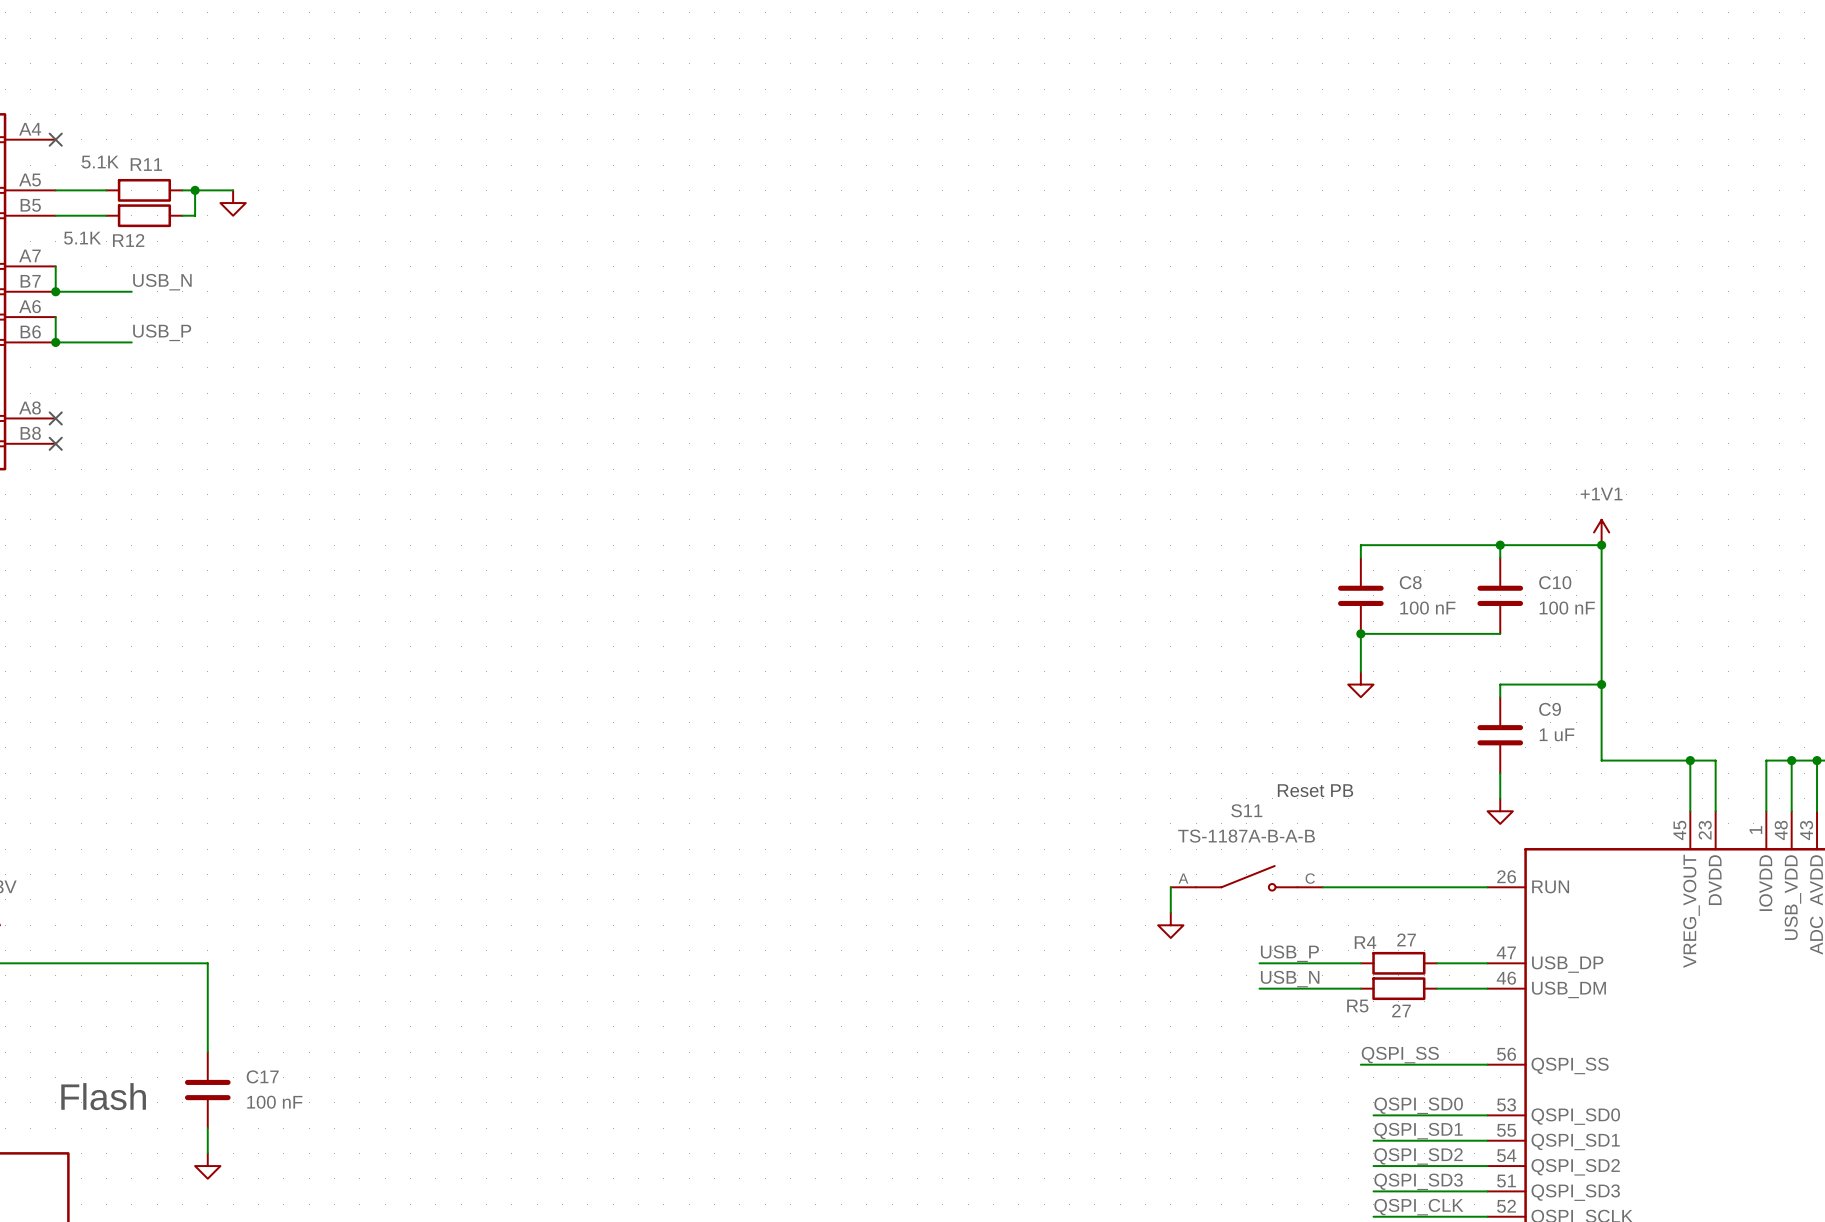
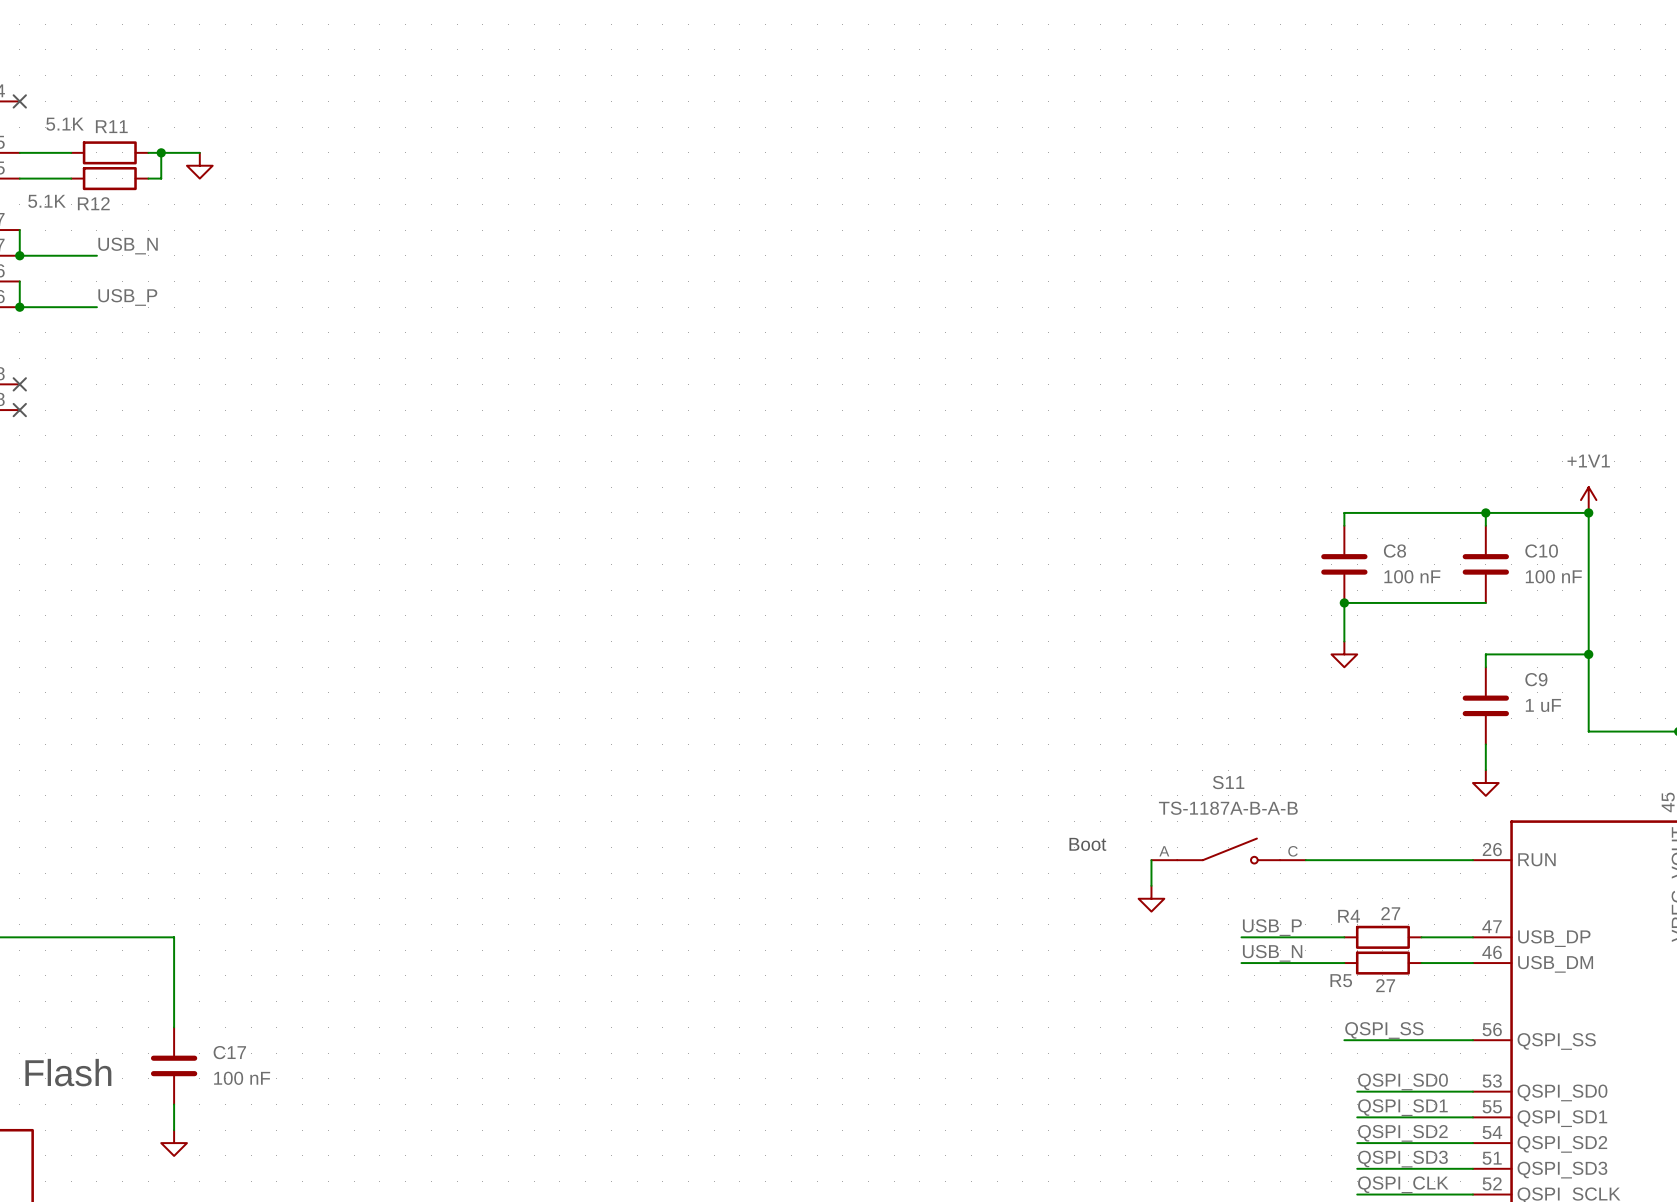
text: Reset PB (1315, 790) -> none
text: none -> Boot (1087, 844)

